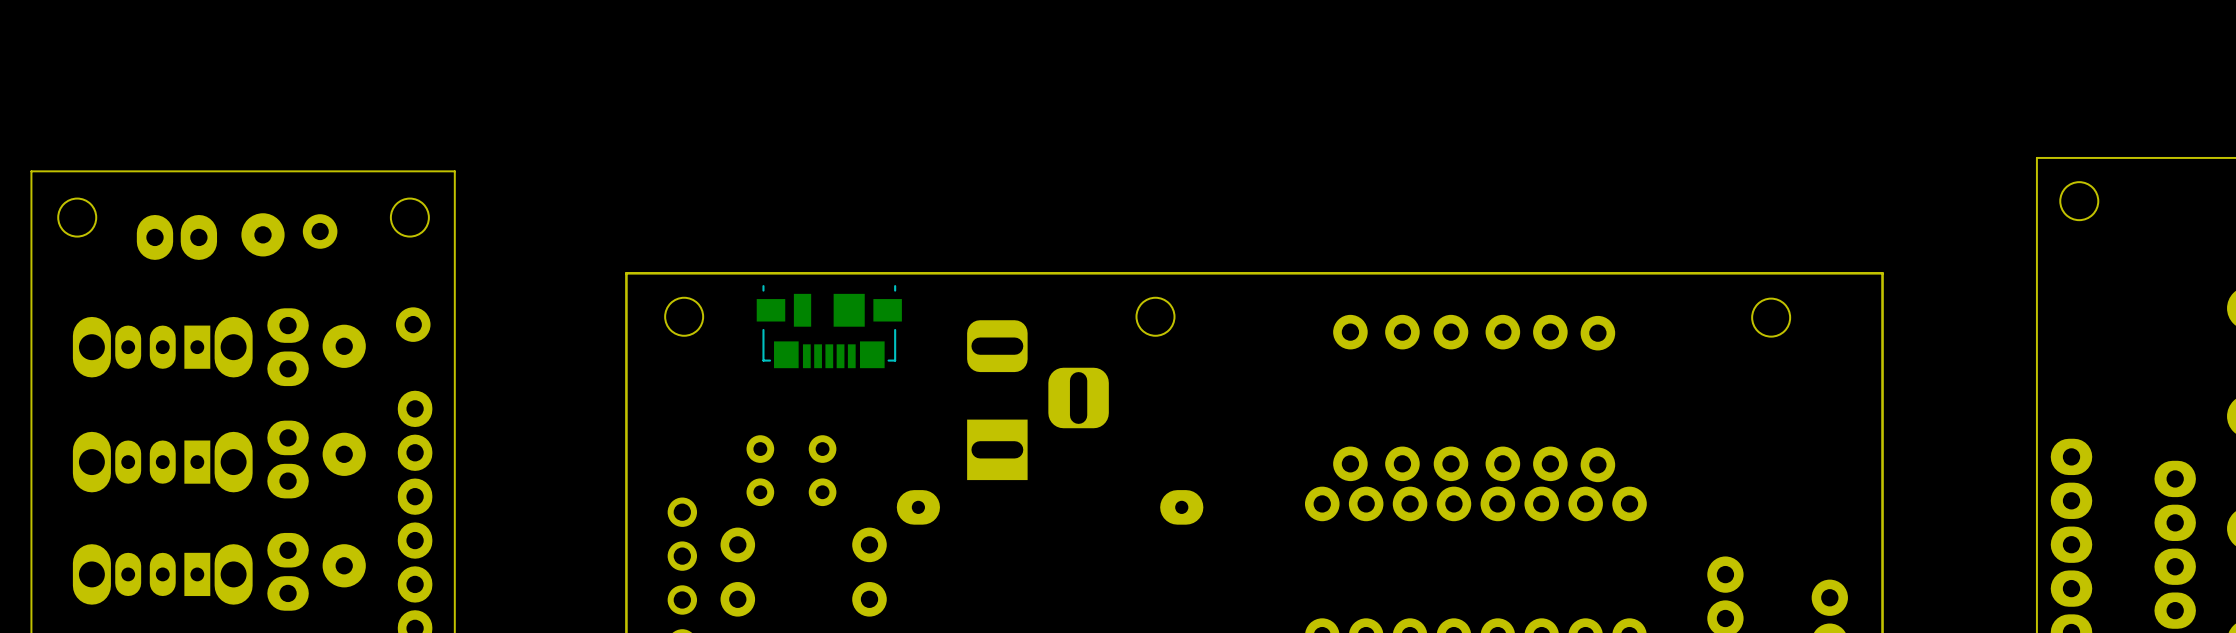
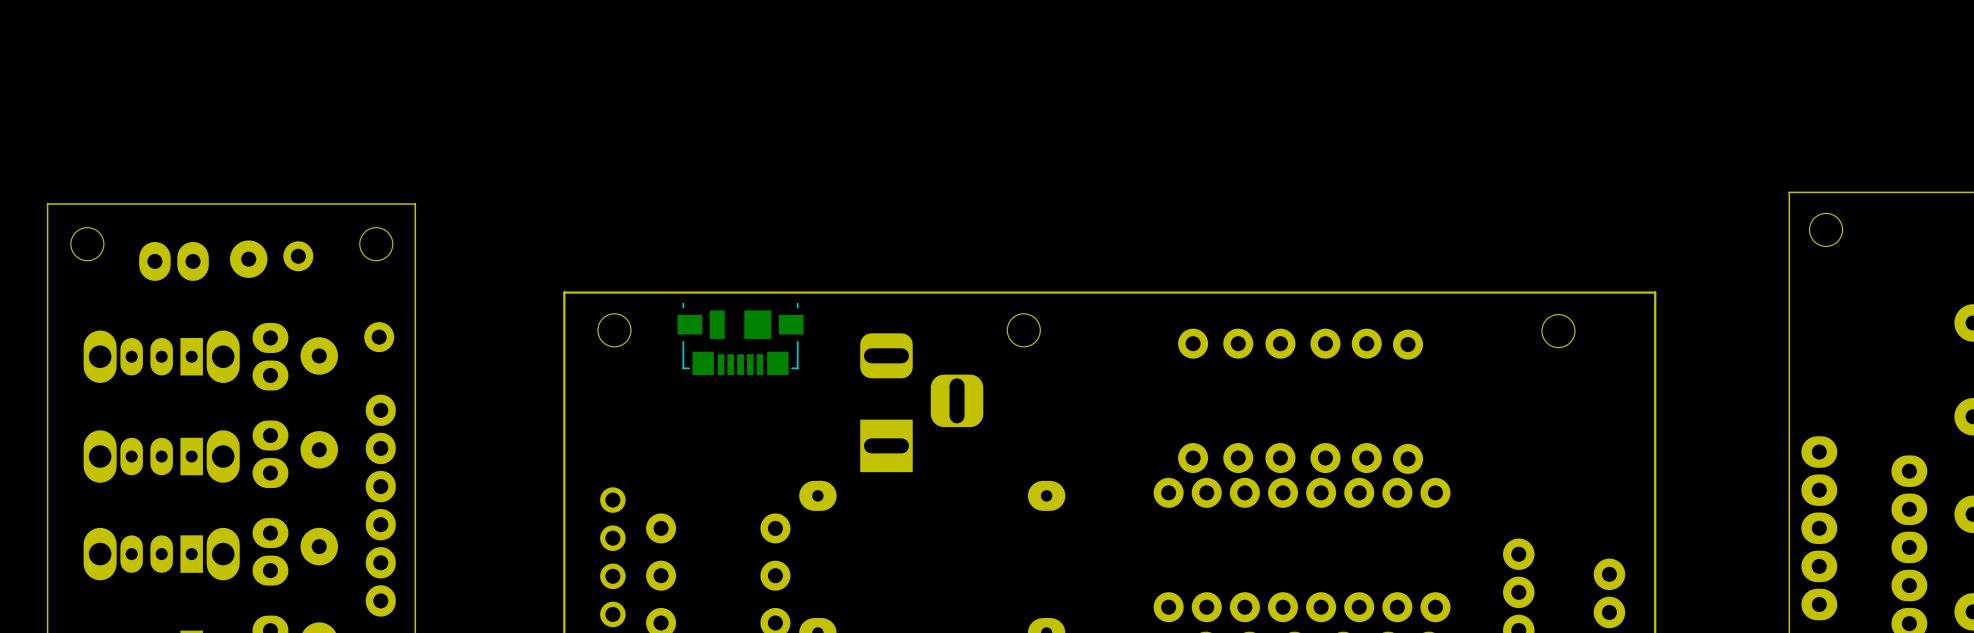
part: (760, 470) -> none
part: (822, 470) -> none

